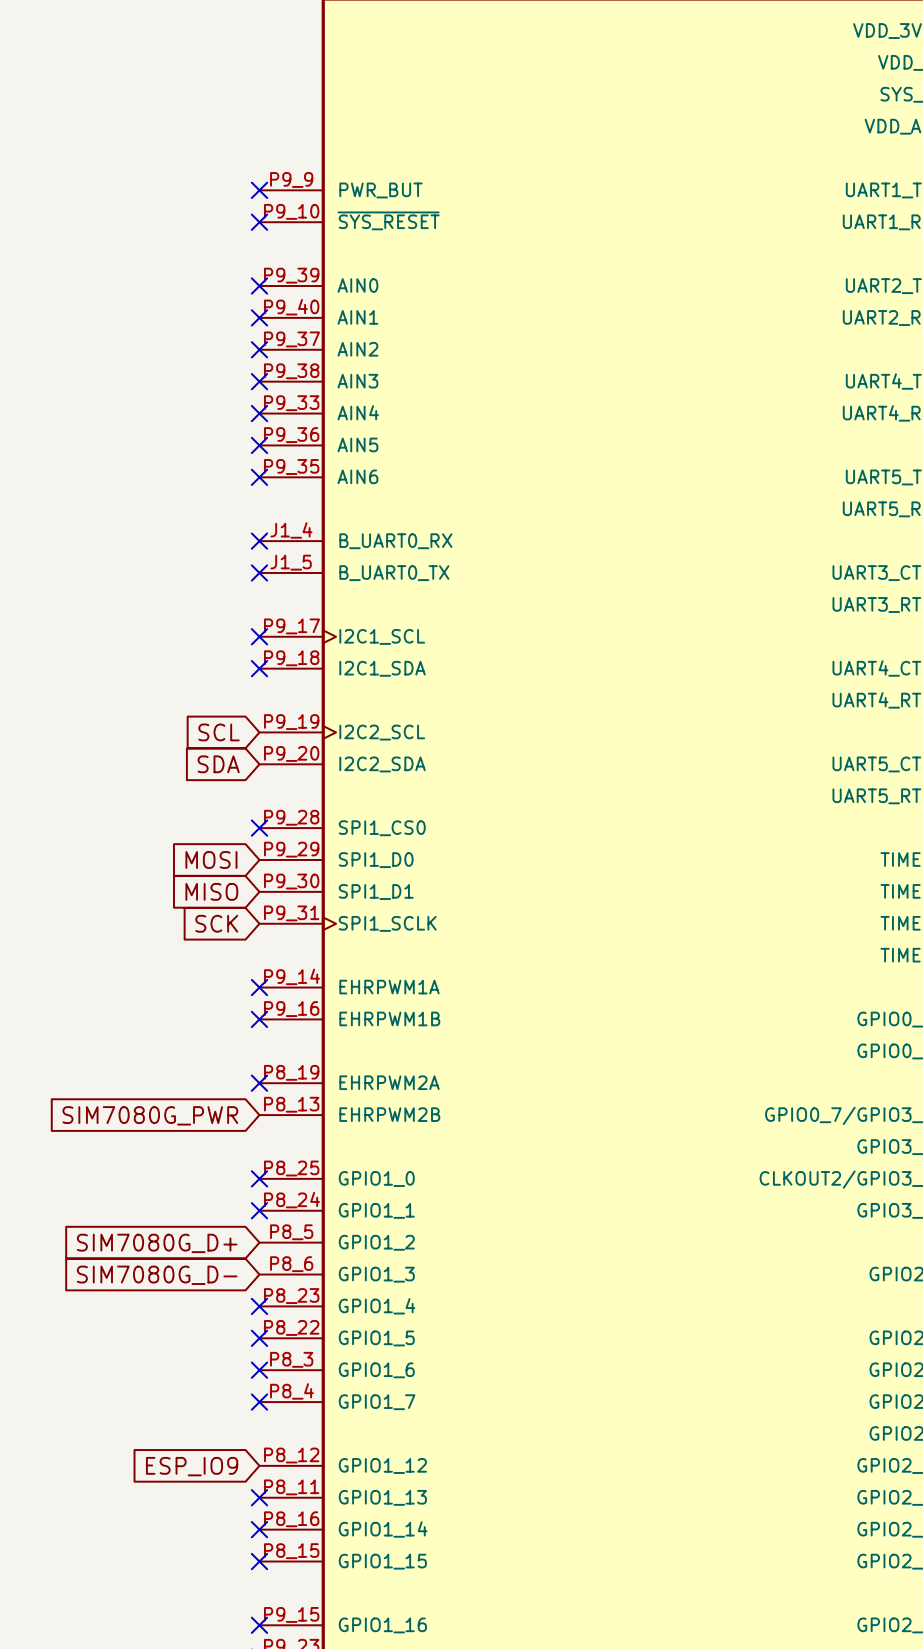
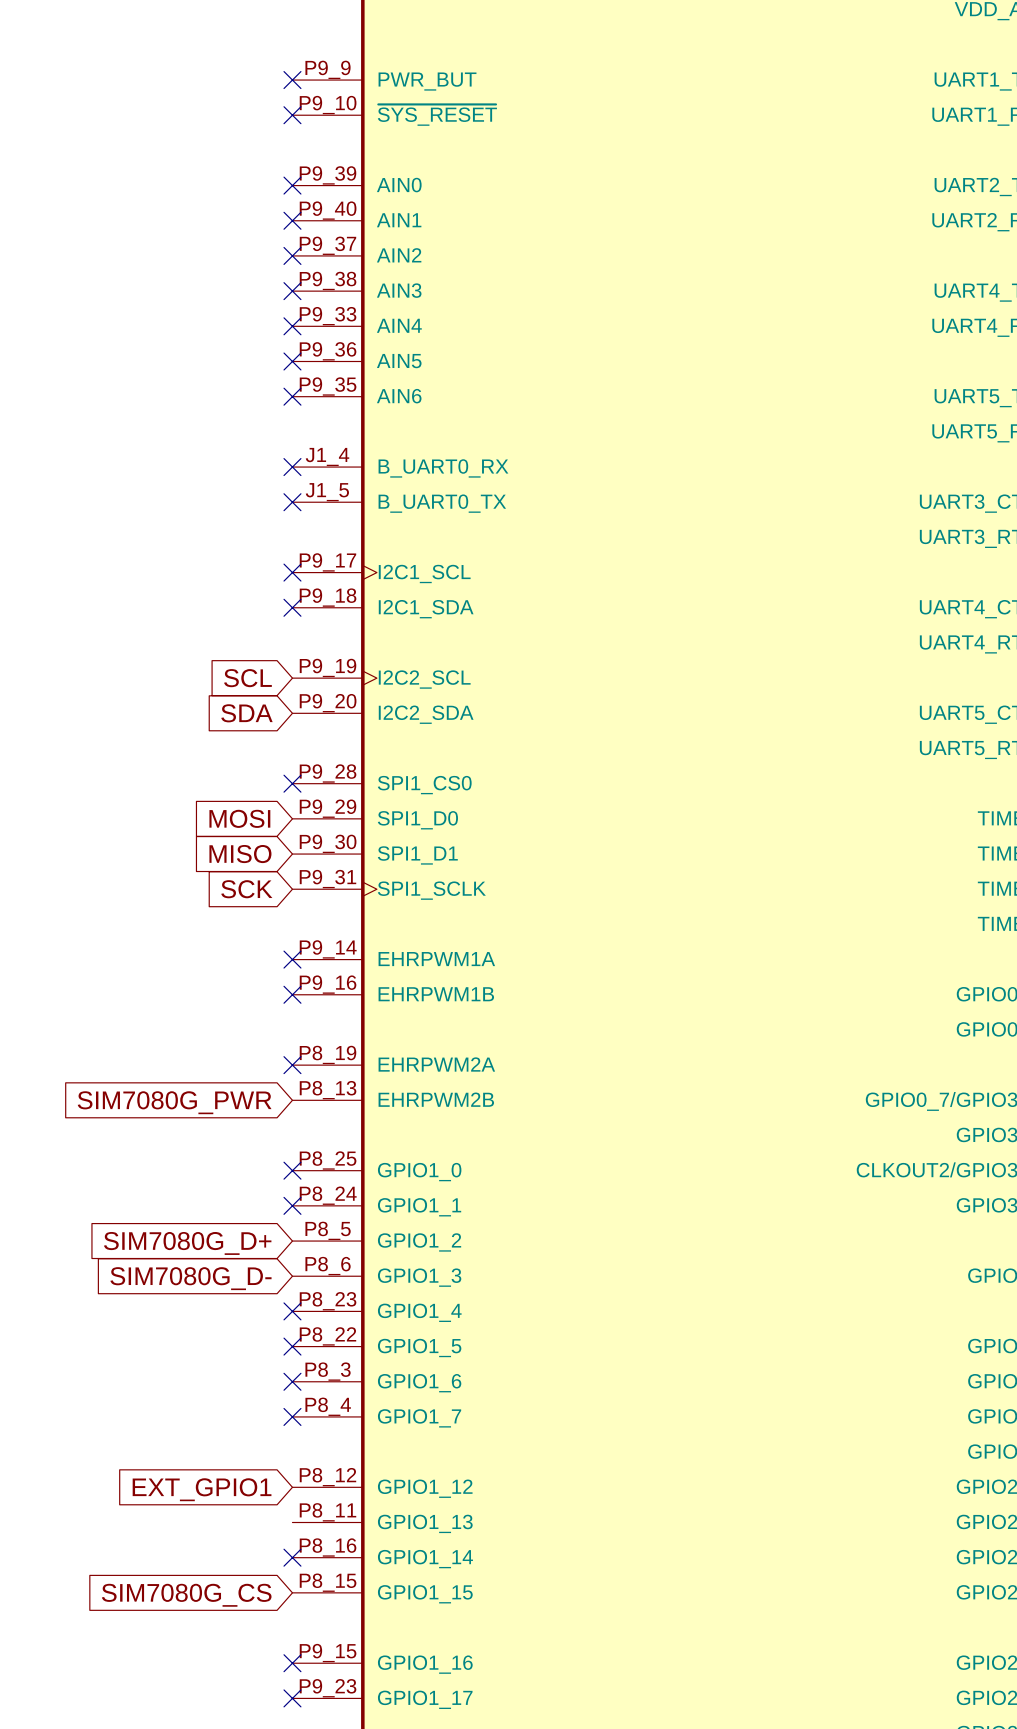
global label: ESP_IO9 (192, 1466) -> EXT_GPIO1 (202, 1489)
no-connect mark: (259, 1497) -> none
no-connect mark: (259, 1561) -> none
global label: none -> SIM7080G_CS (186, 1595)

